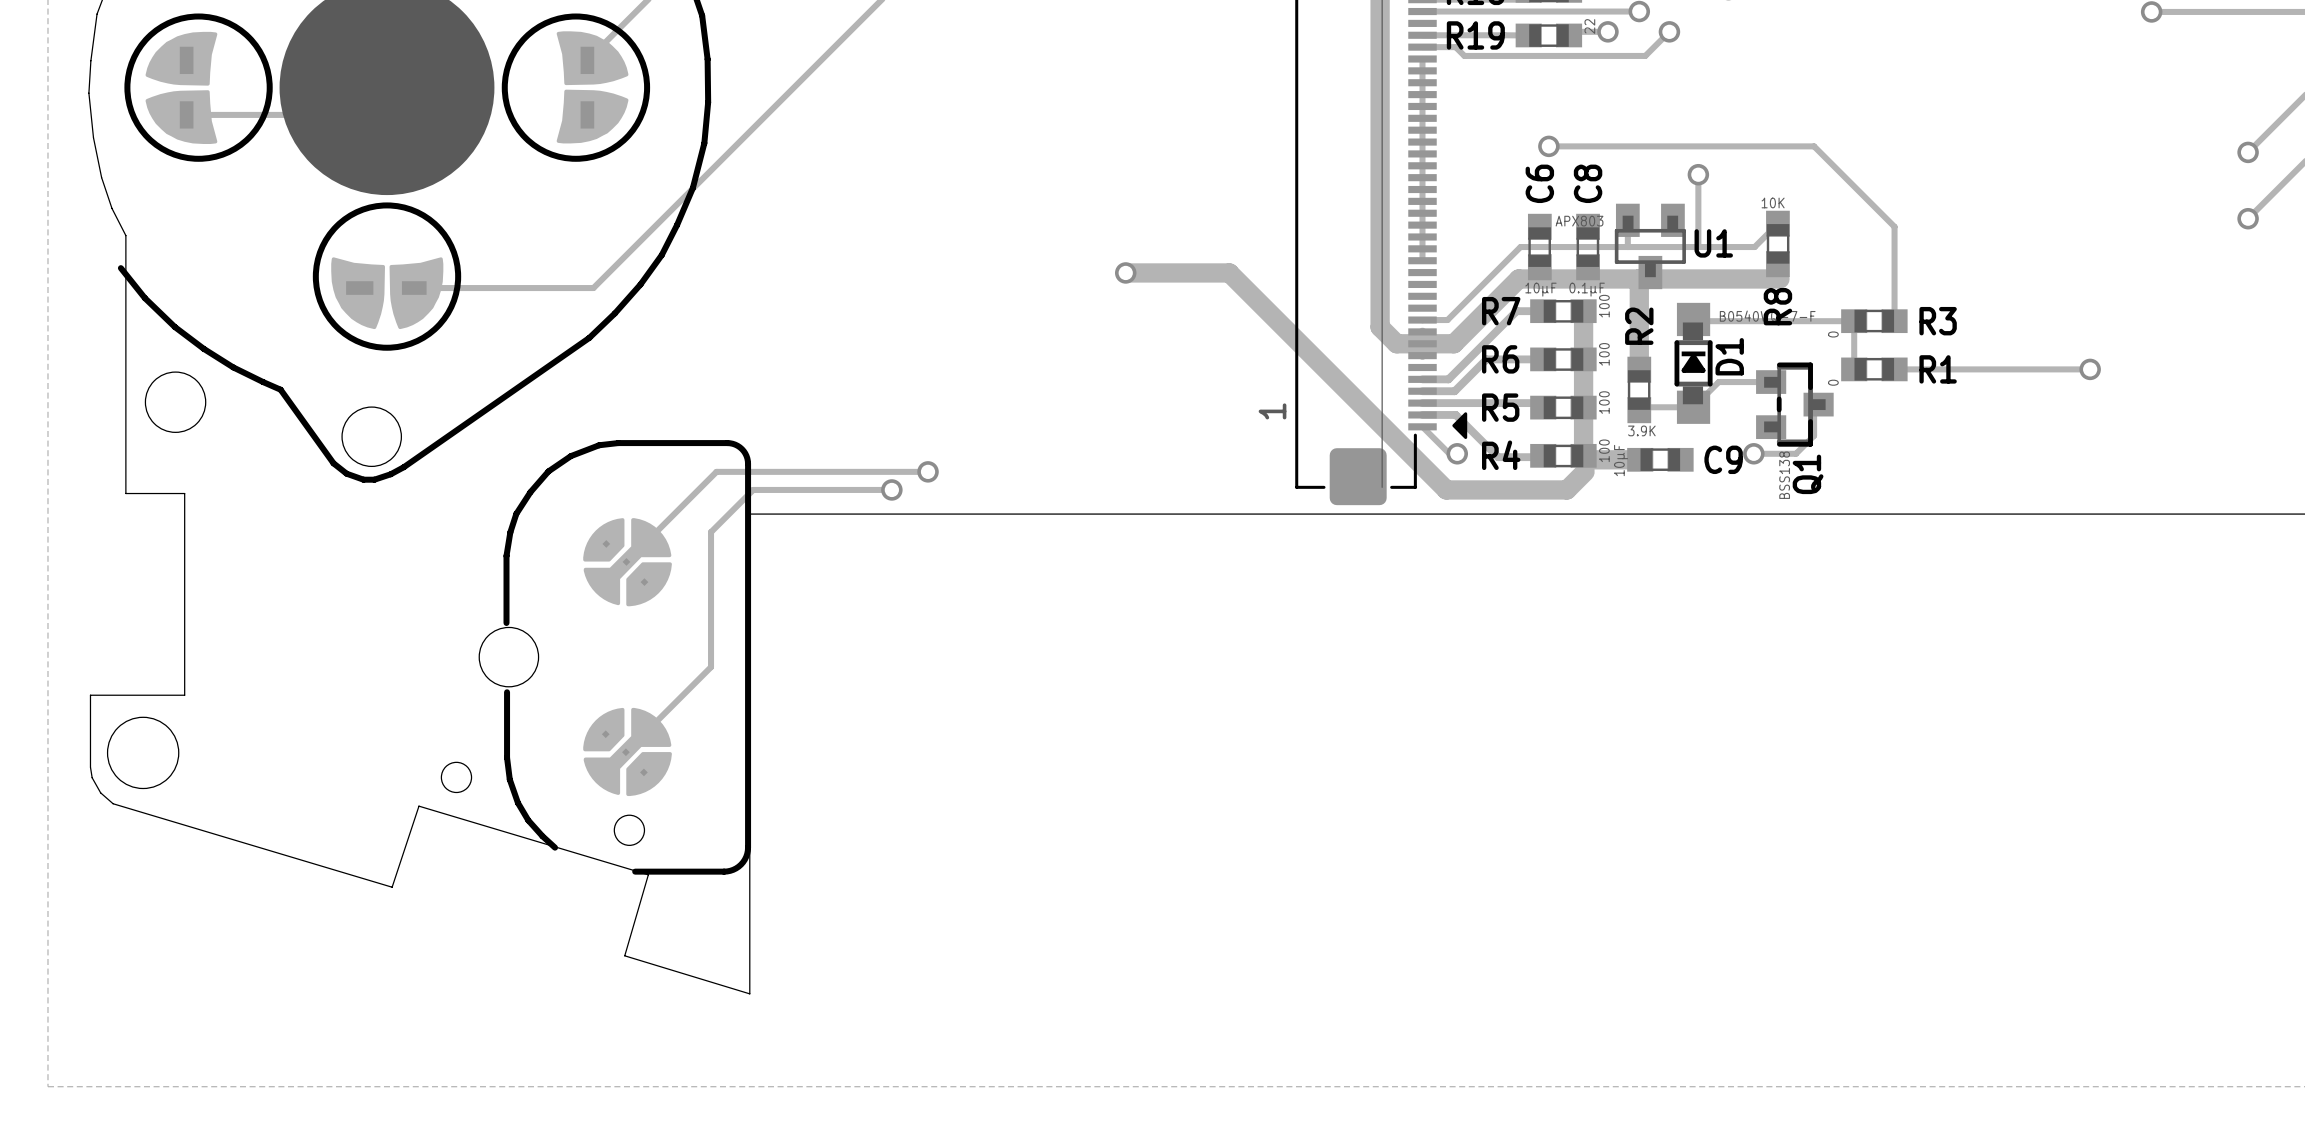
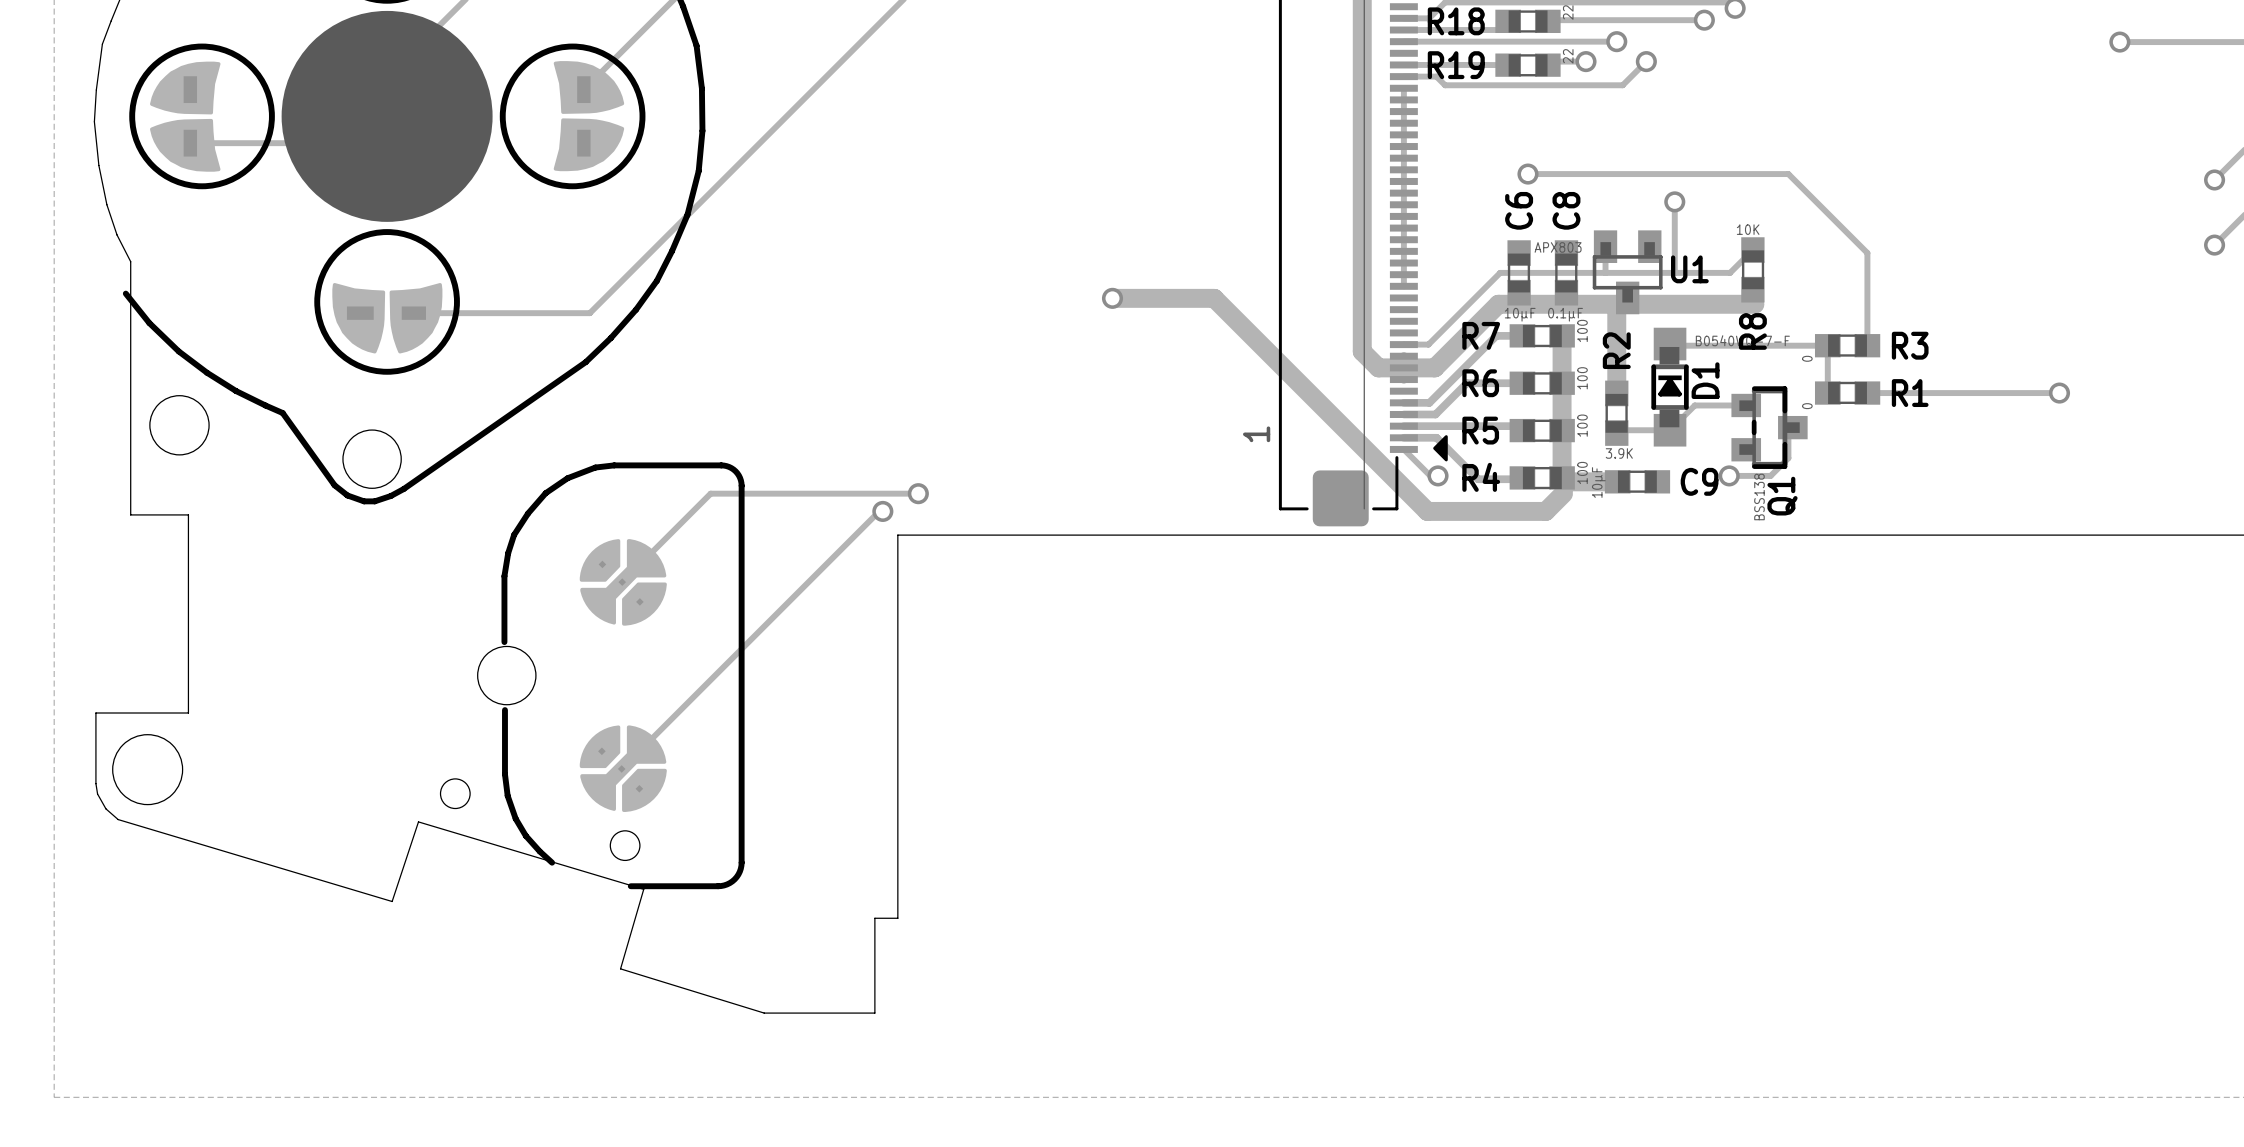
track: (888, 489) (753, 489) (711, 532) (711, 667) -> (879, 511) (705, 685)
board edge: (907, 514) (749, 514) (749, 993) (624, 955) -> (897, 535) (897, 918) (874, 918) (874, 1013) (764, 1013) (620, 968)

